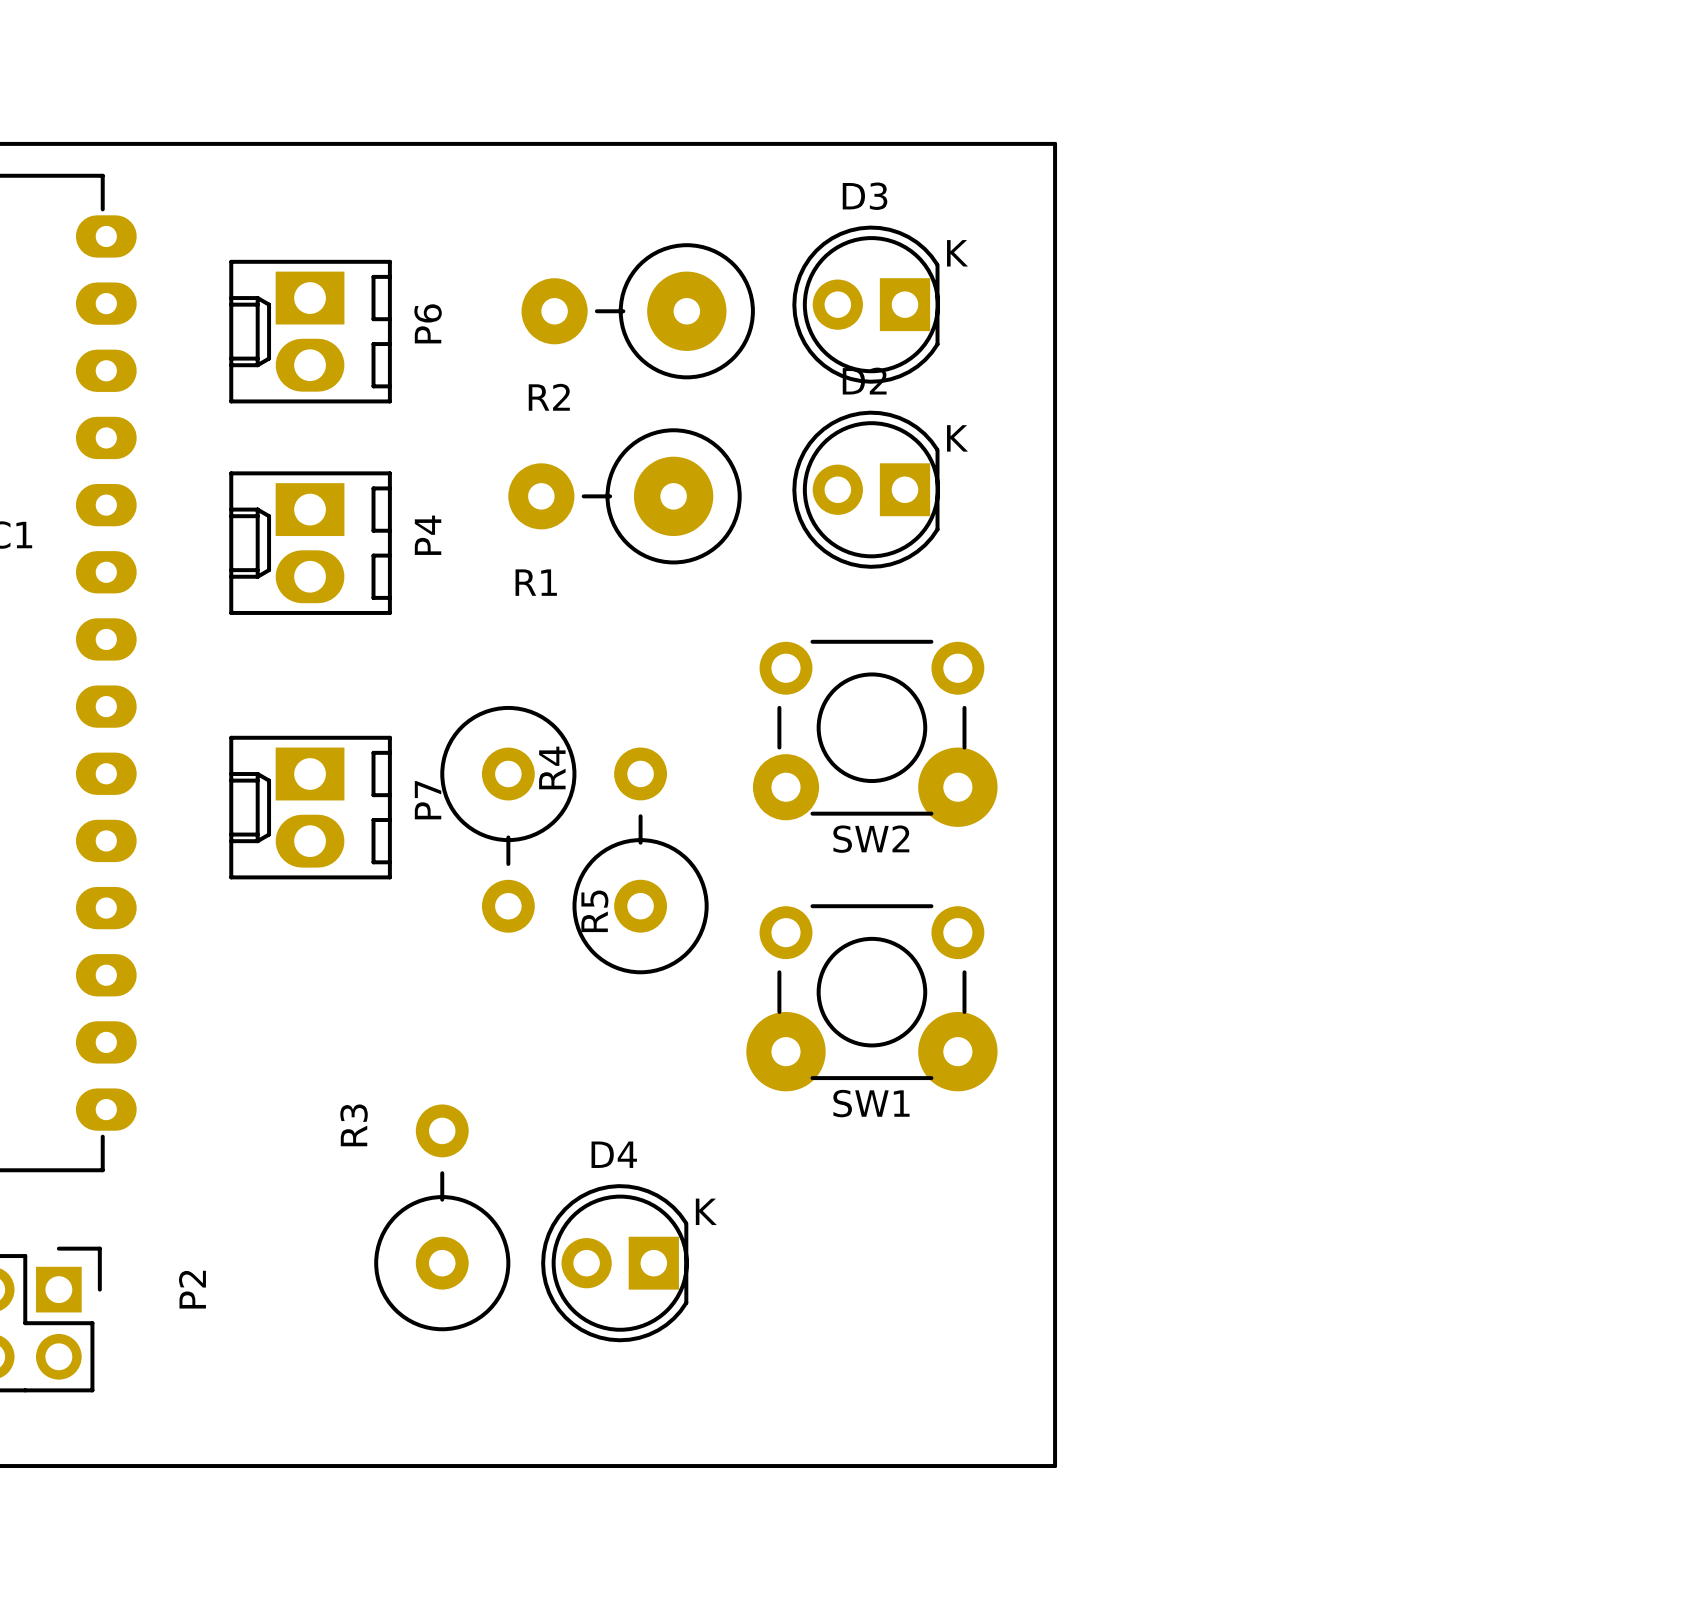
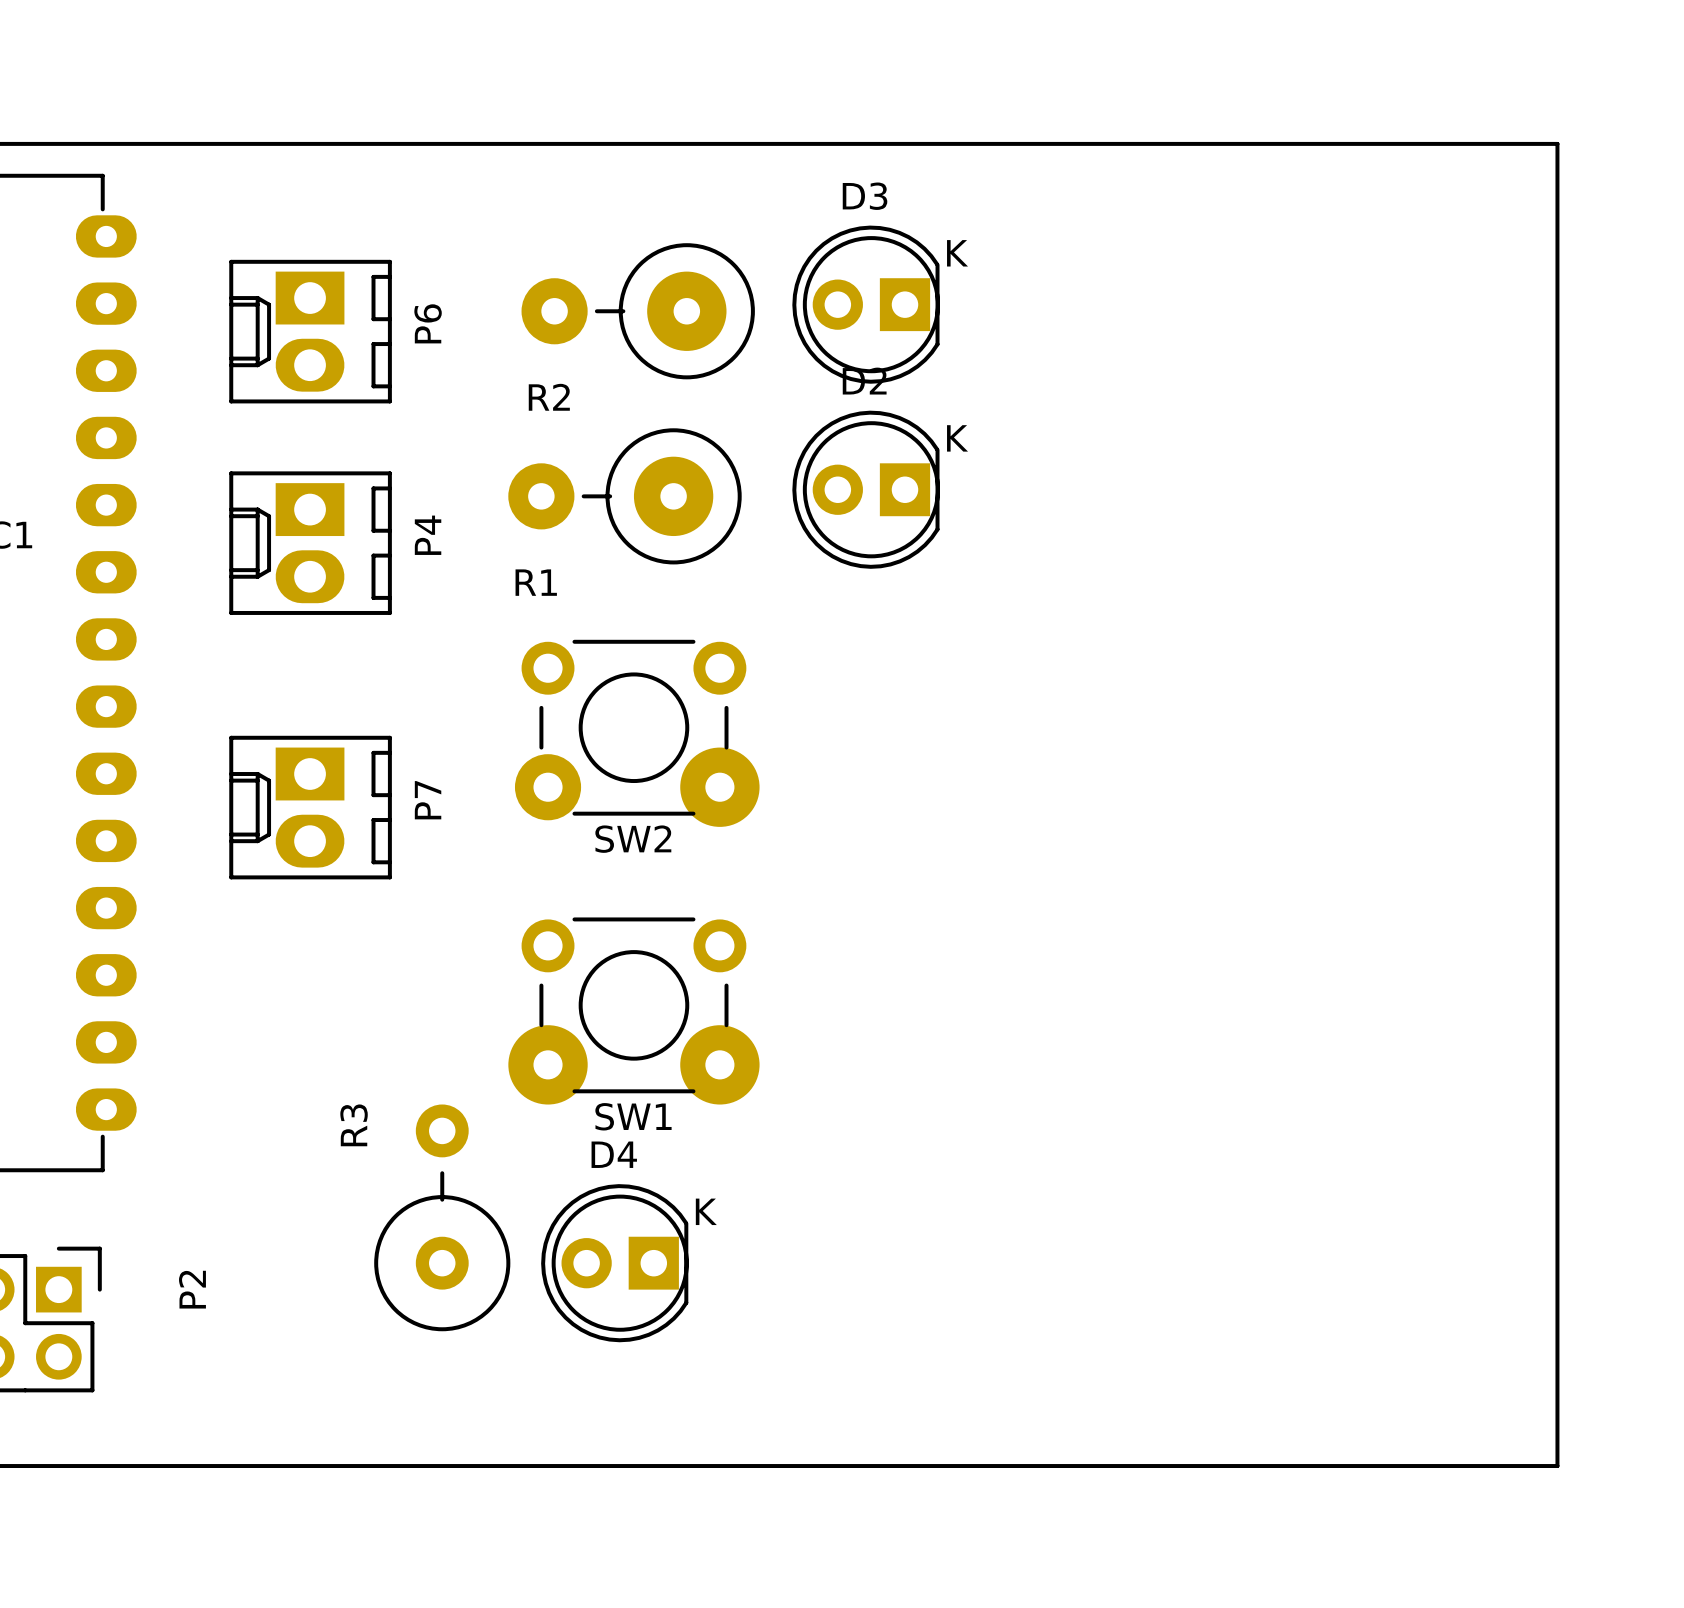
board edge: (1055, 143) (1055, 1466) -> (1055, 143) (1557, 143) (1557, 1466) (1055, 1466)
SW2 position: (875, 733) -> (637, 733)
R5: (508, 819) -> none
R4: (640, 860) -> none
SW1 position: (871, 997) -> (633, 1010)

